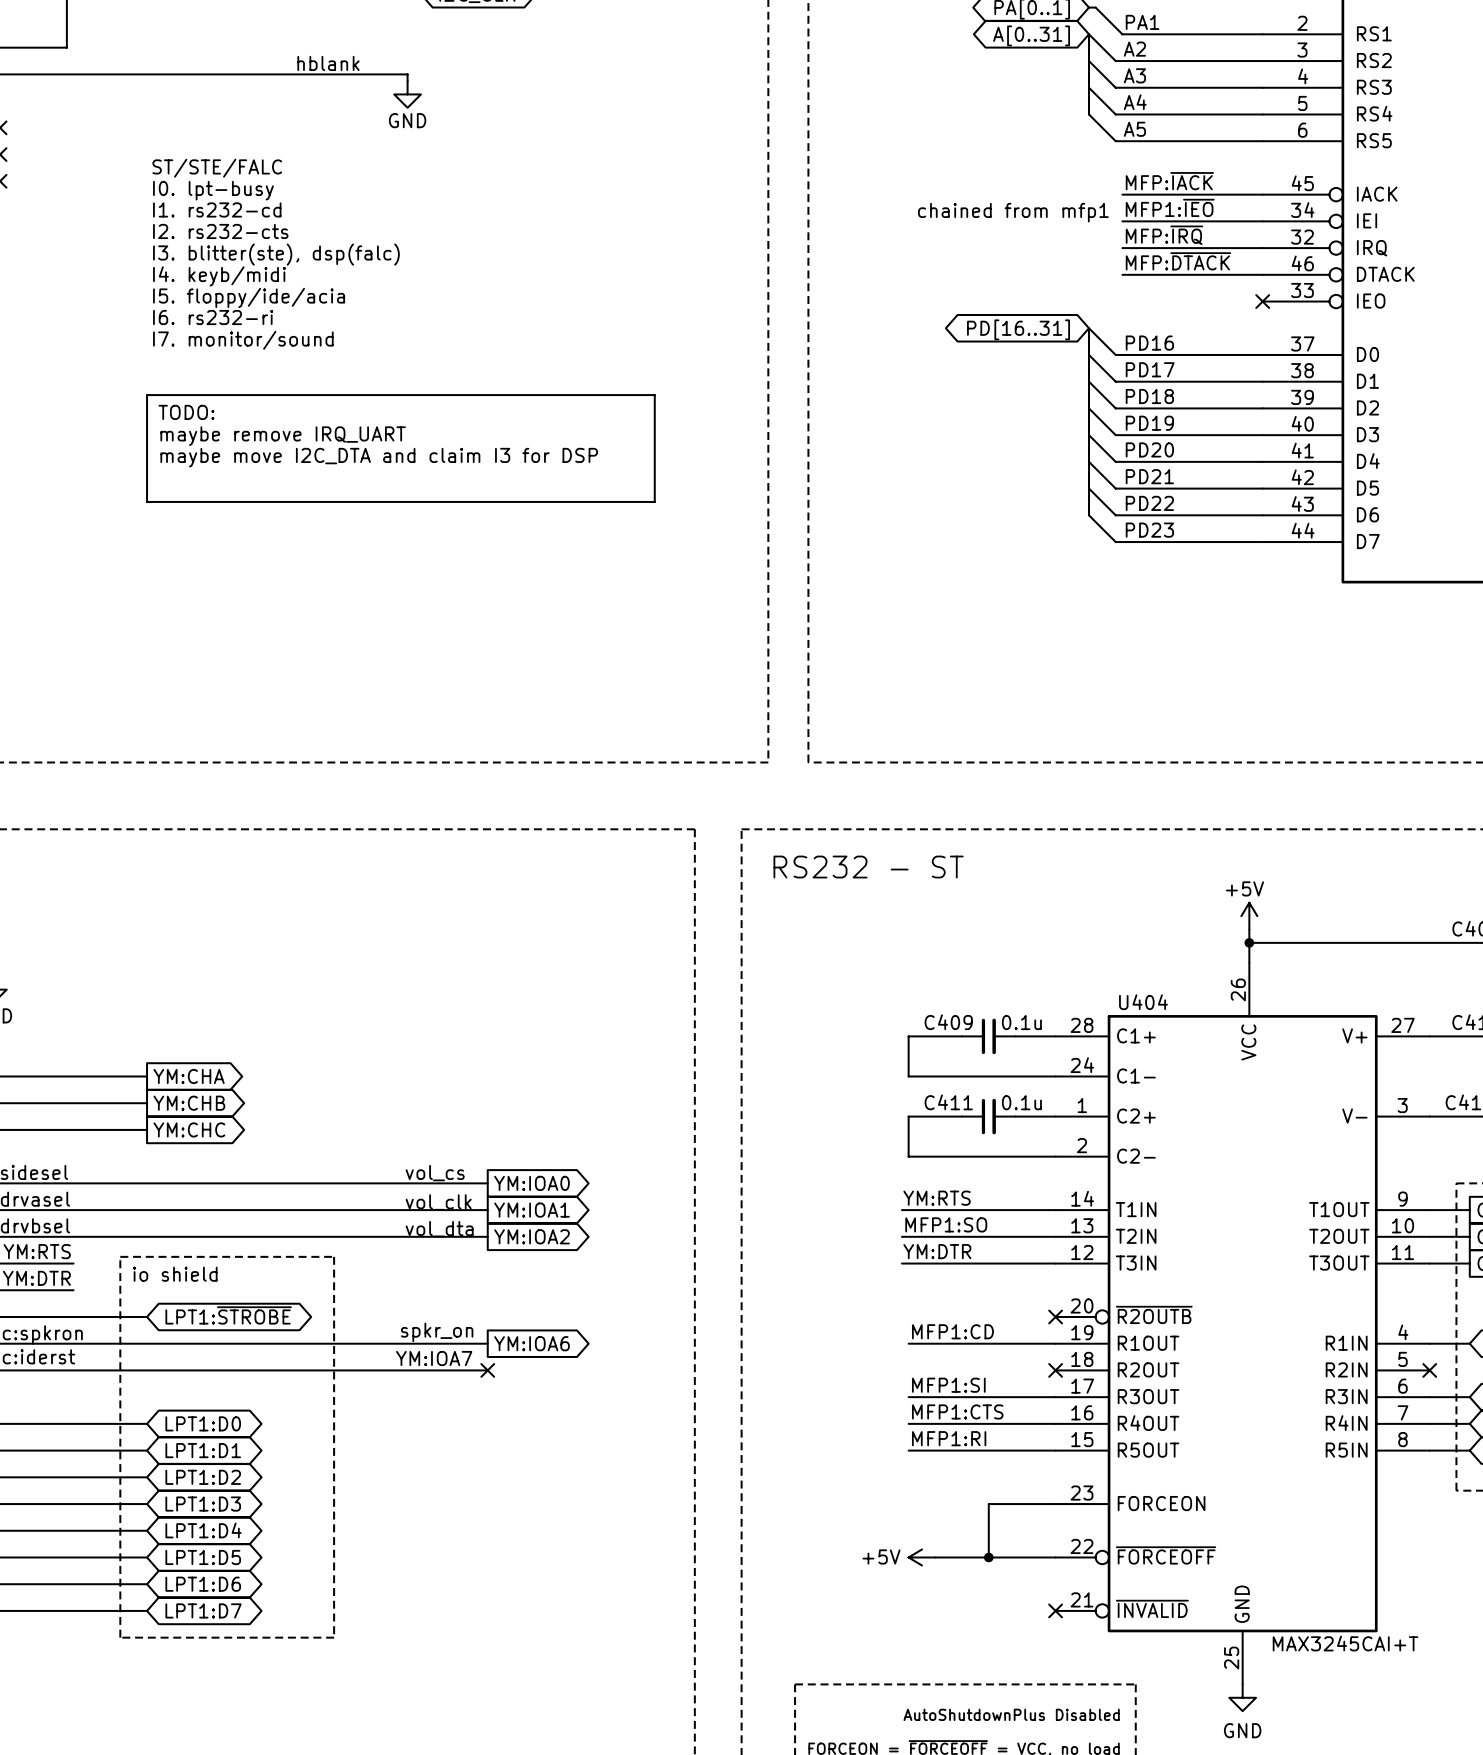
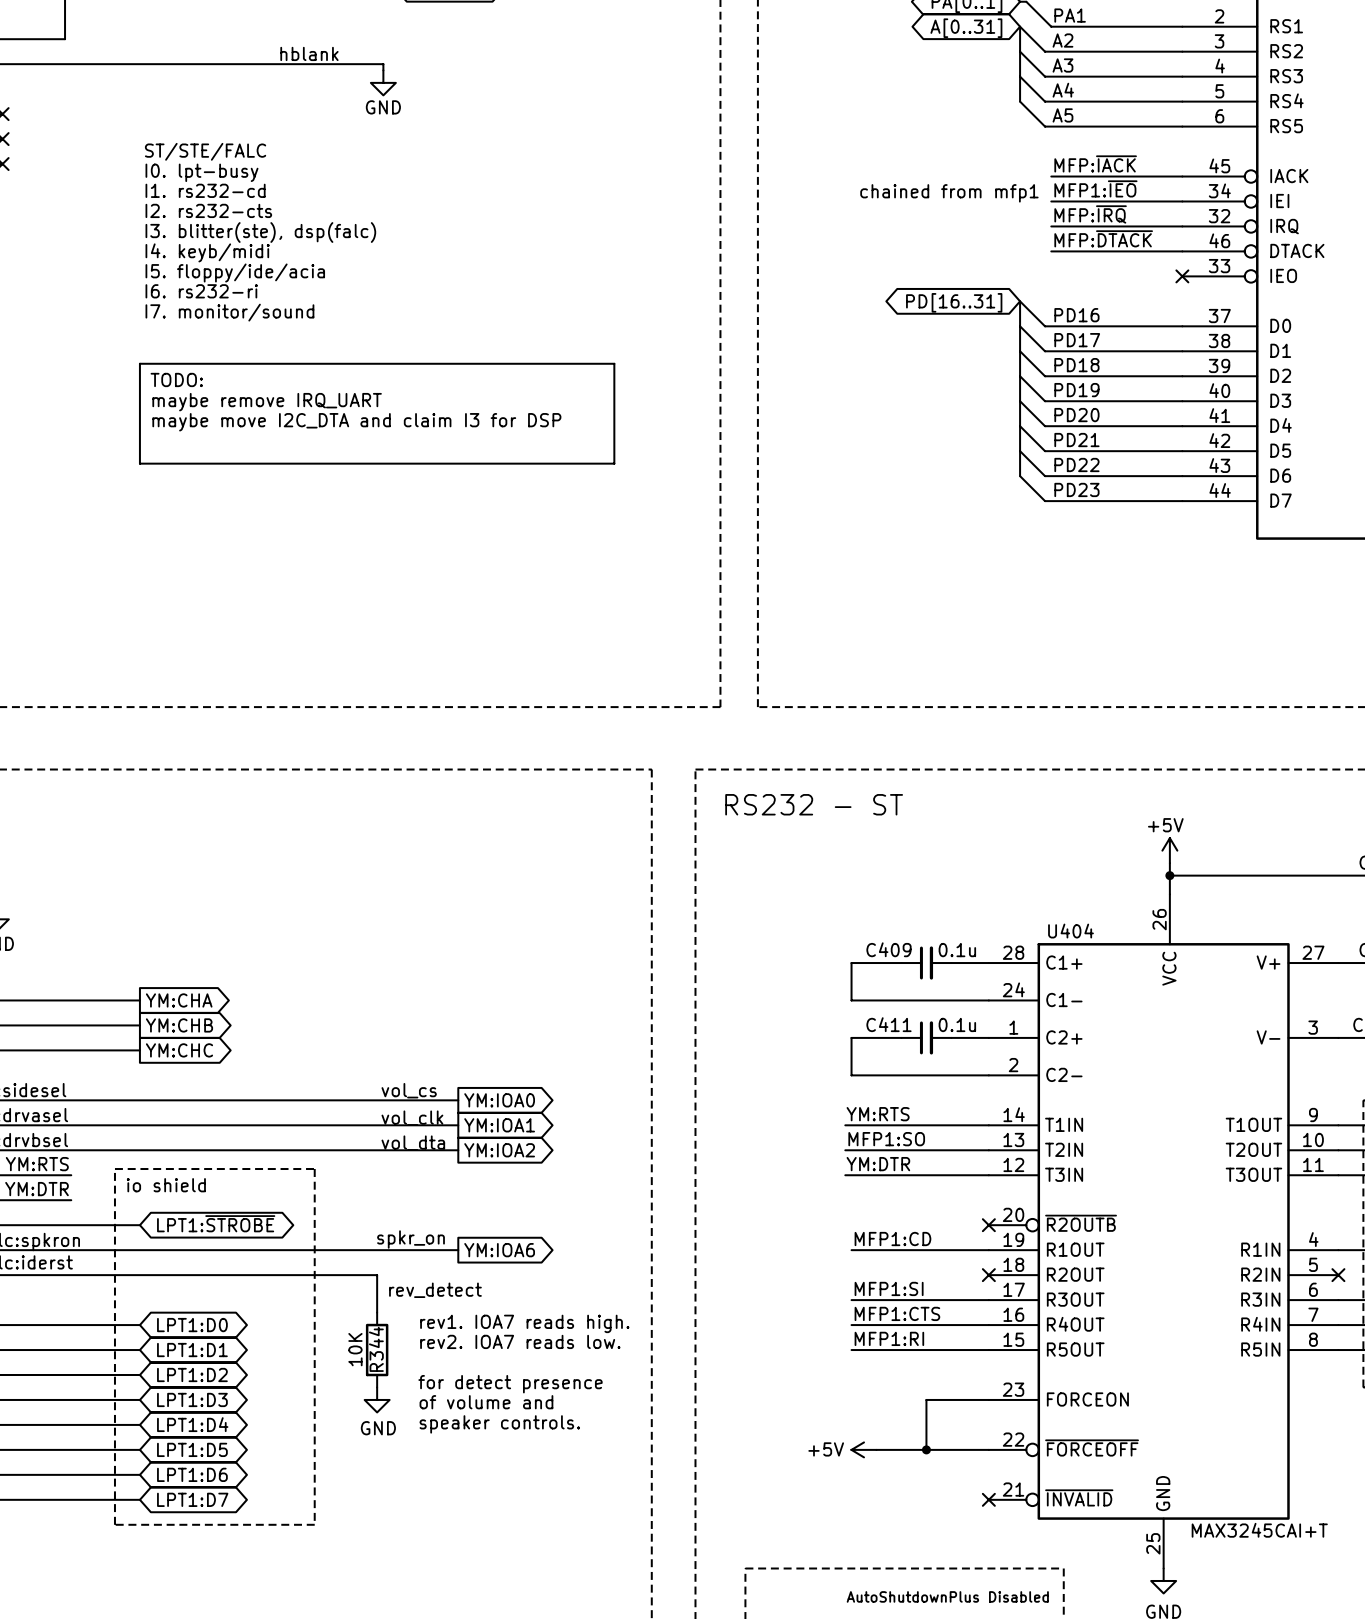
label: YM:IOA7 (434, 1358) -> none
wire: (400, 1370) (487, 1370) -> (377, 1275) (377, 1312)
no-connect mark: (487, 1370) -> none
text: none -> rev_detect (435, 1290)
text: none -> rev1. IOA7 reads high. (524, 1323)
text: none -> rev2. IOA7 reads low. (520, 1341)
R344: none -> 10K (377, 1350)
text: none -> for detect presence (510, 1384)
power symbol: none -> GND (377, 1399)
text: none -> of volume and (486, 1402)
text: none -> speaker controls. (499, 1424)

